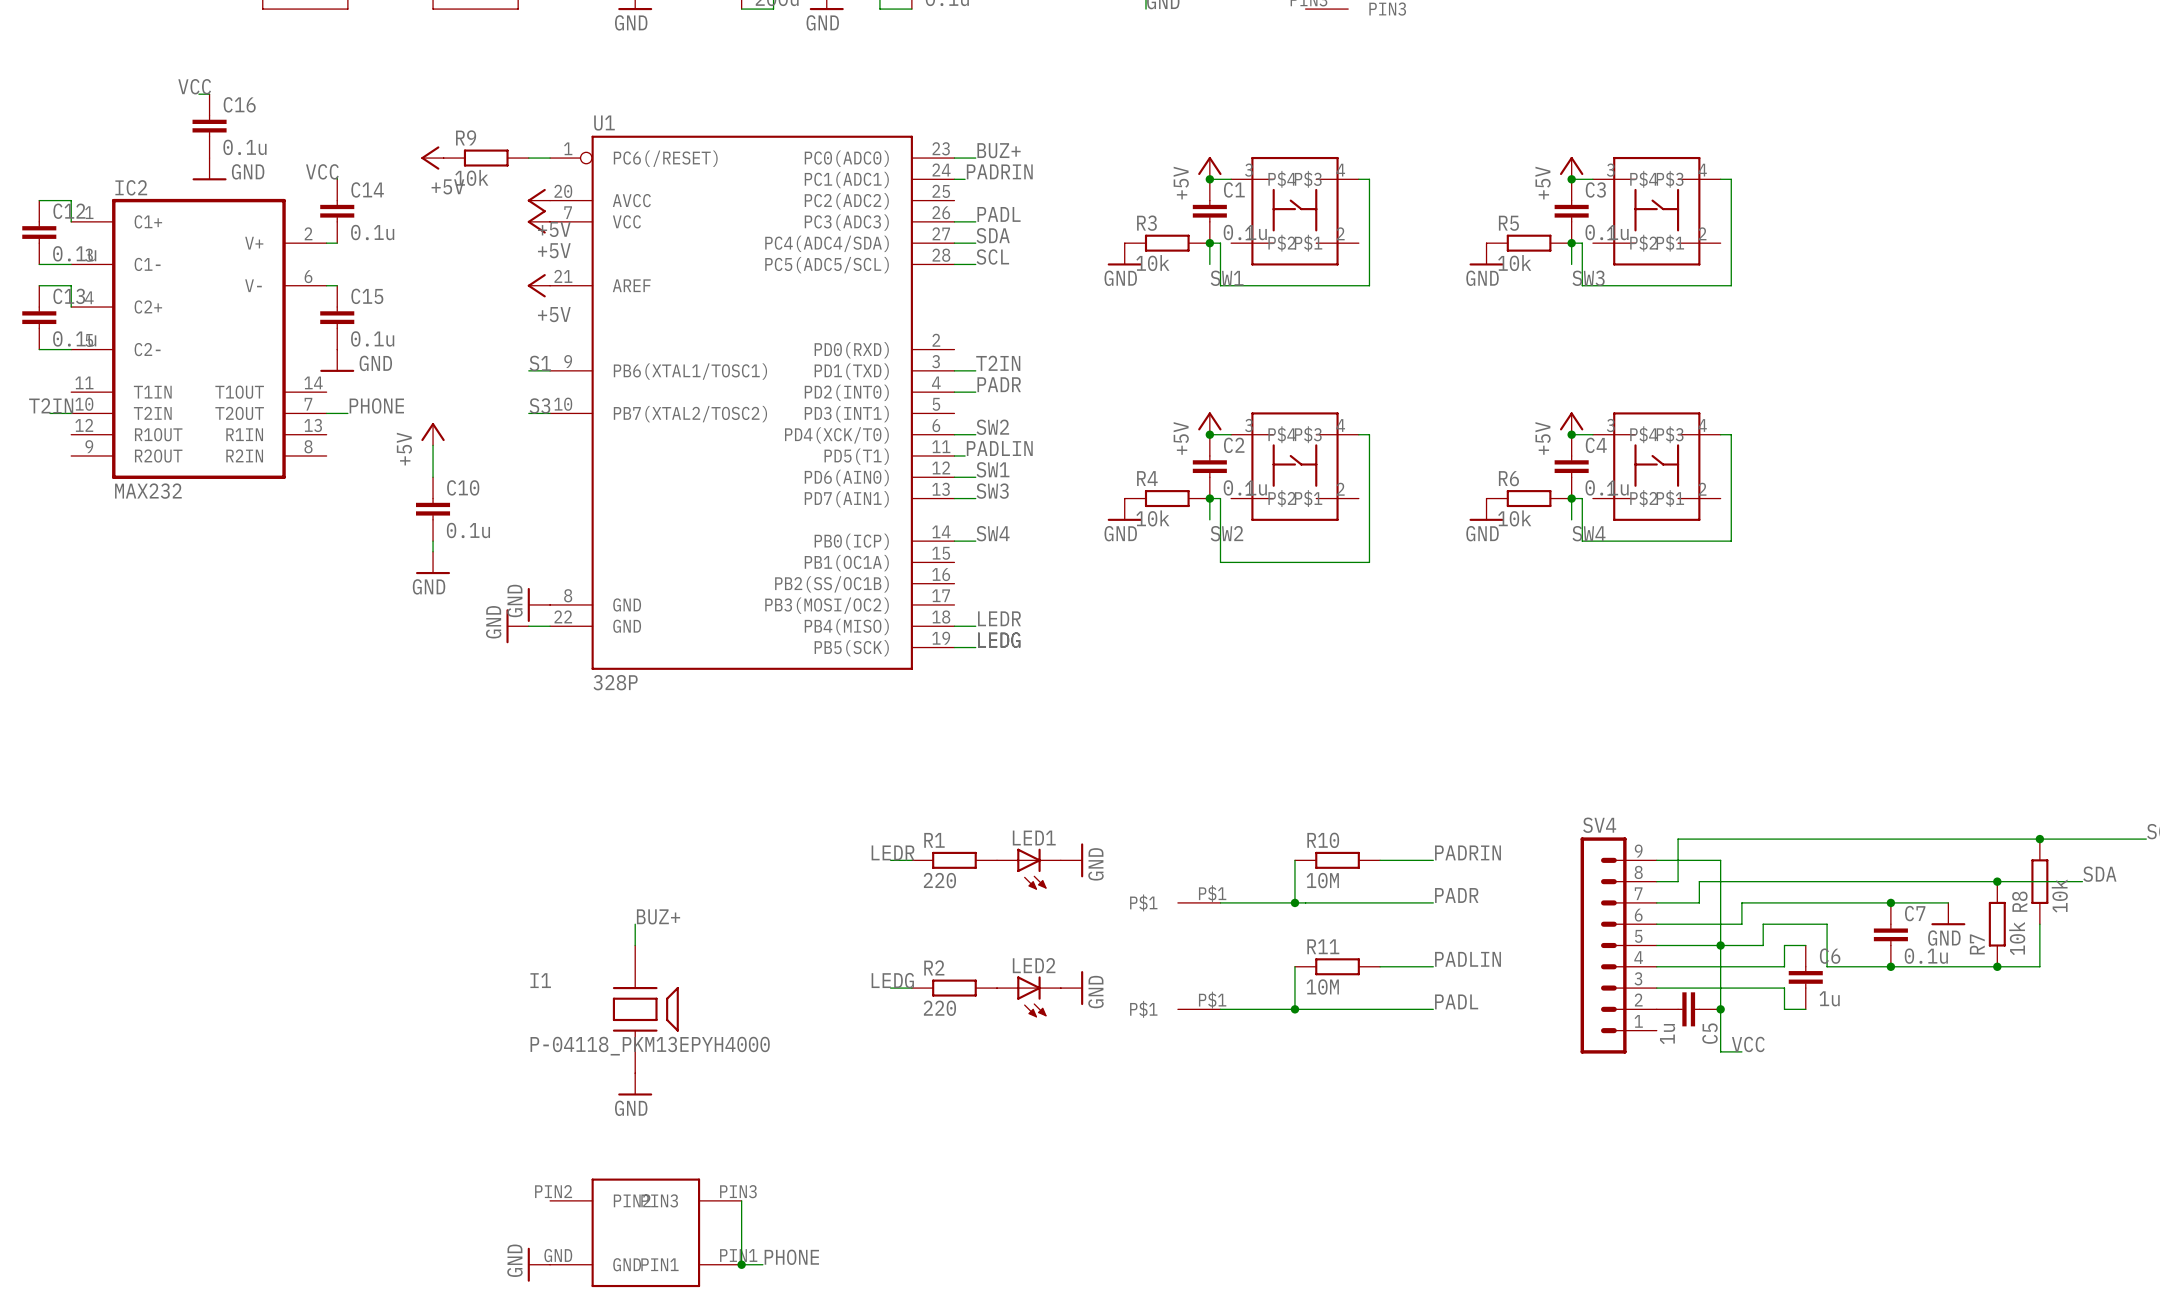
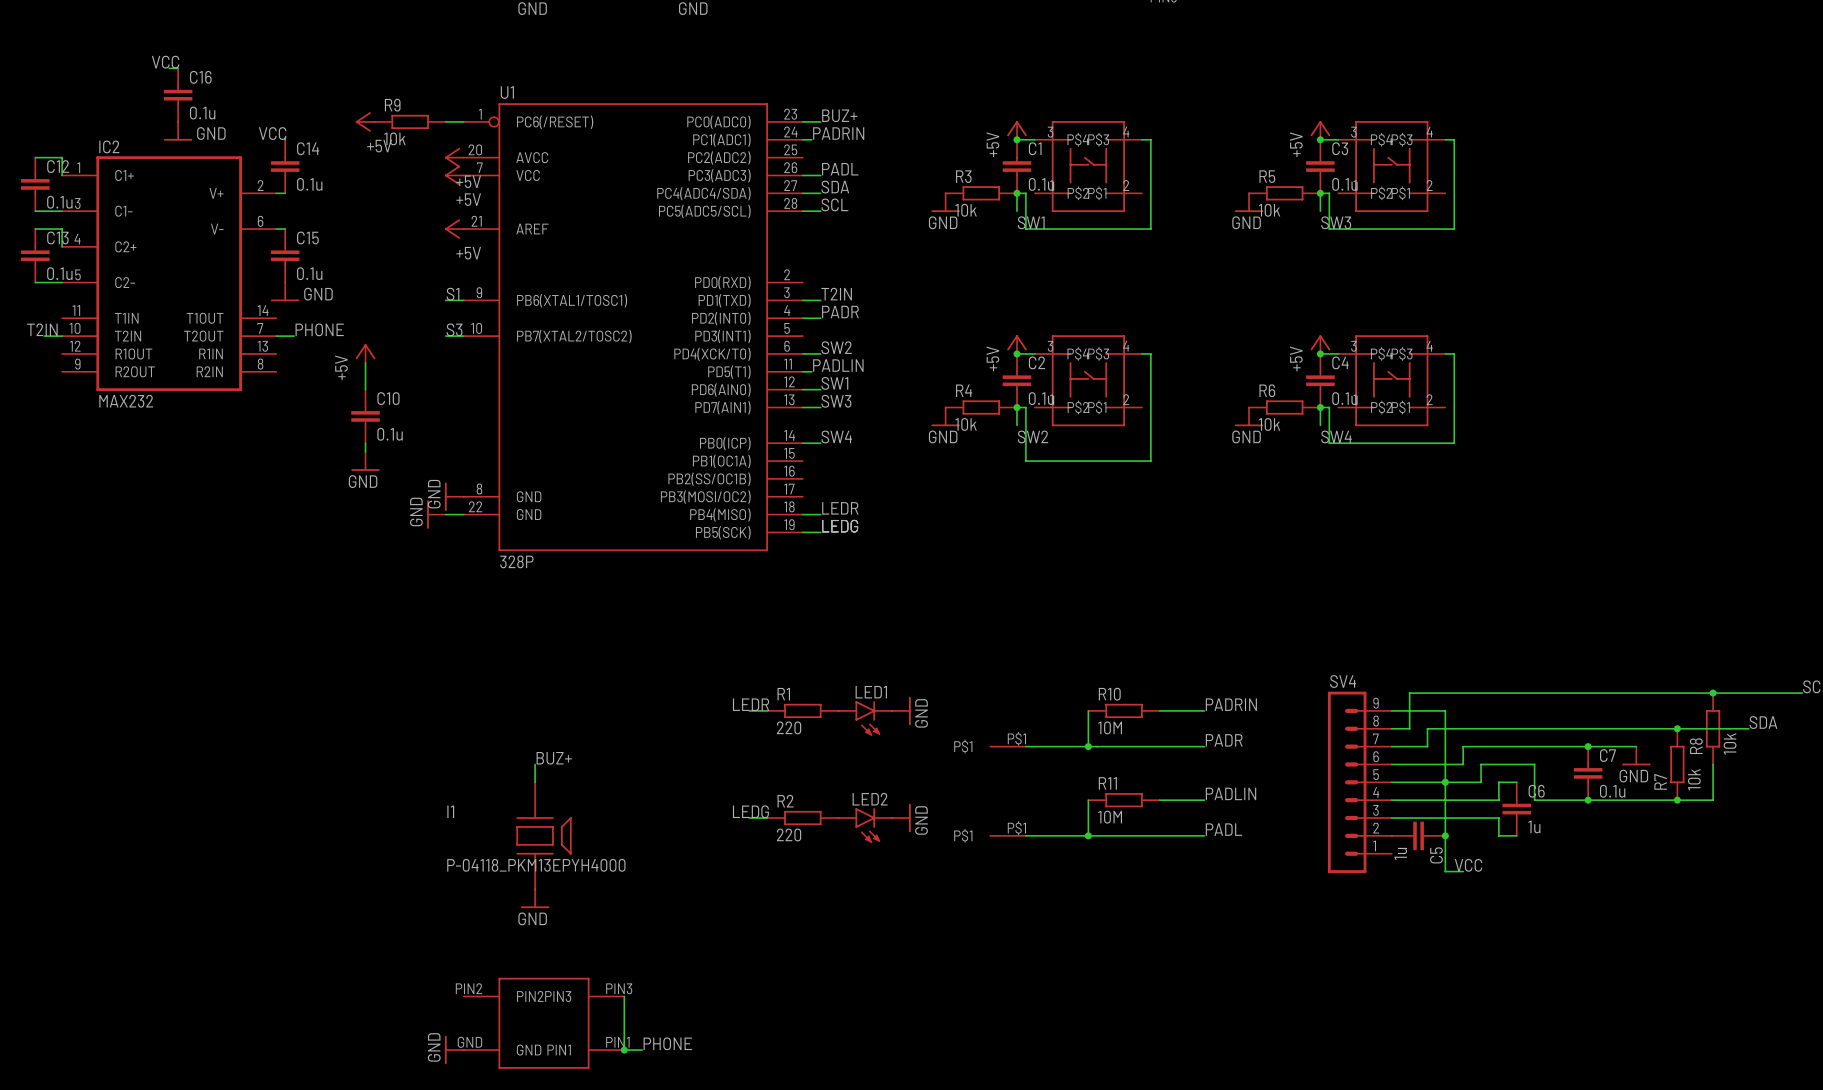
LED1 symbol: [997, 848, 1061, 890] -> [838, 701, 893, 736]
LED2 symbol: [997, 976, 1061, 1018] -> [838, 808, 893, 843]

